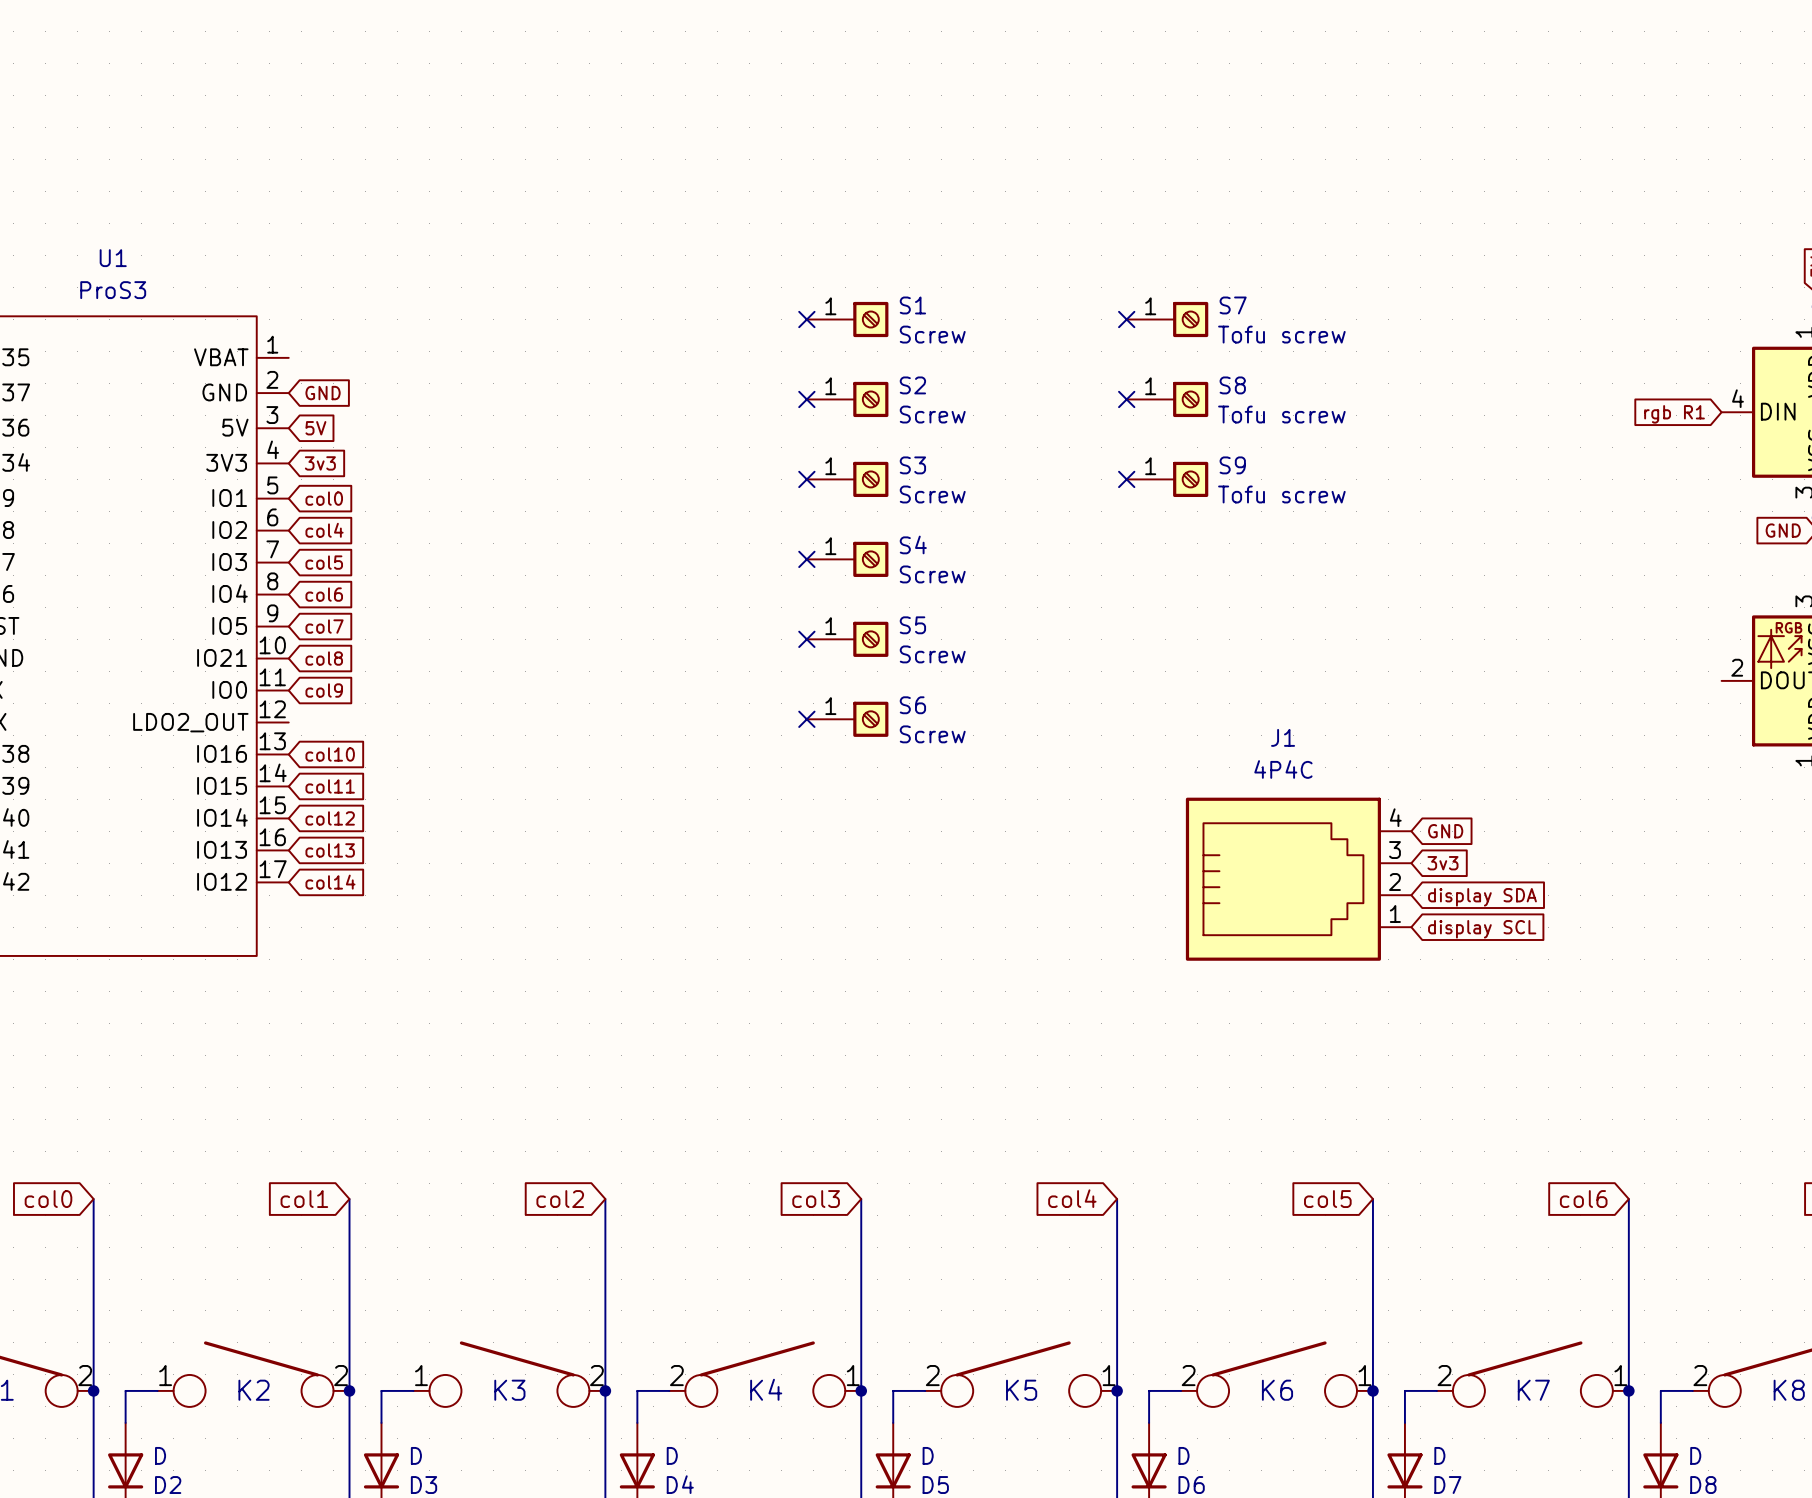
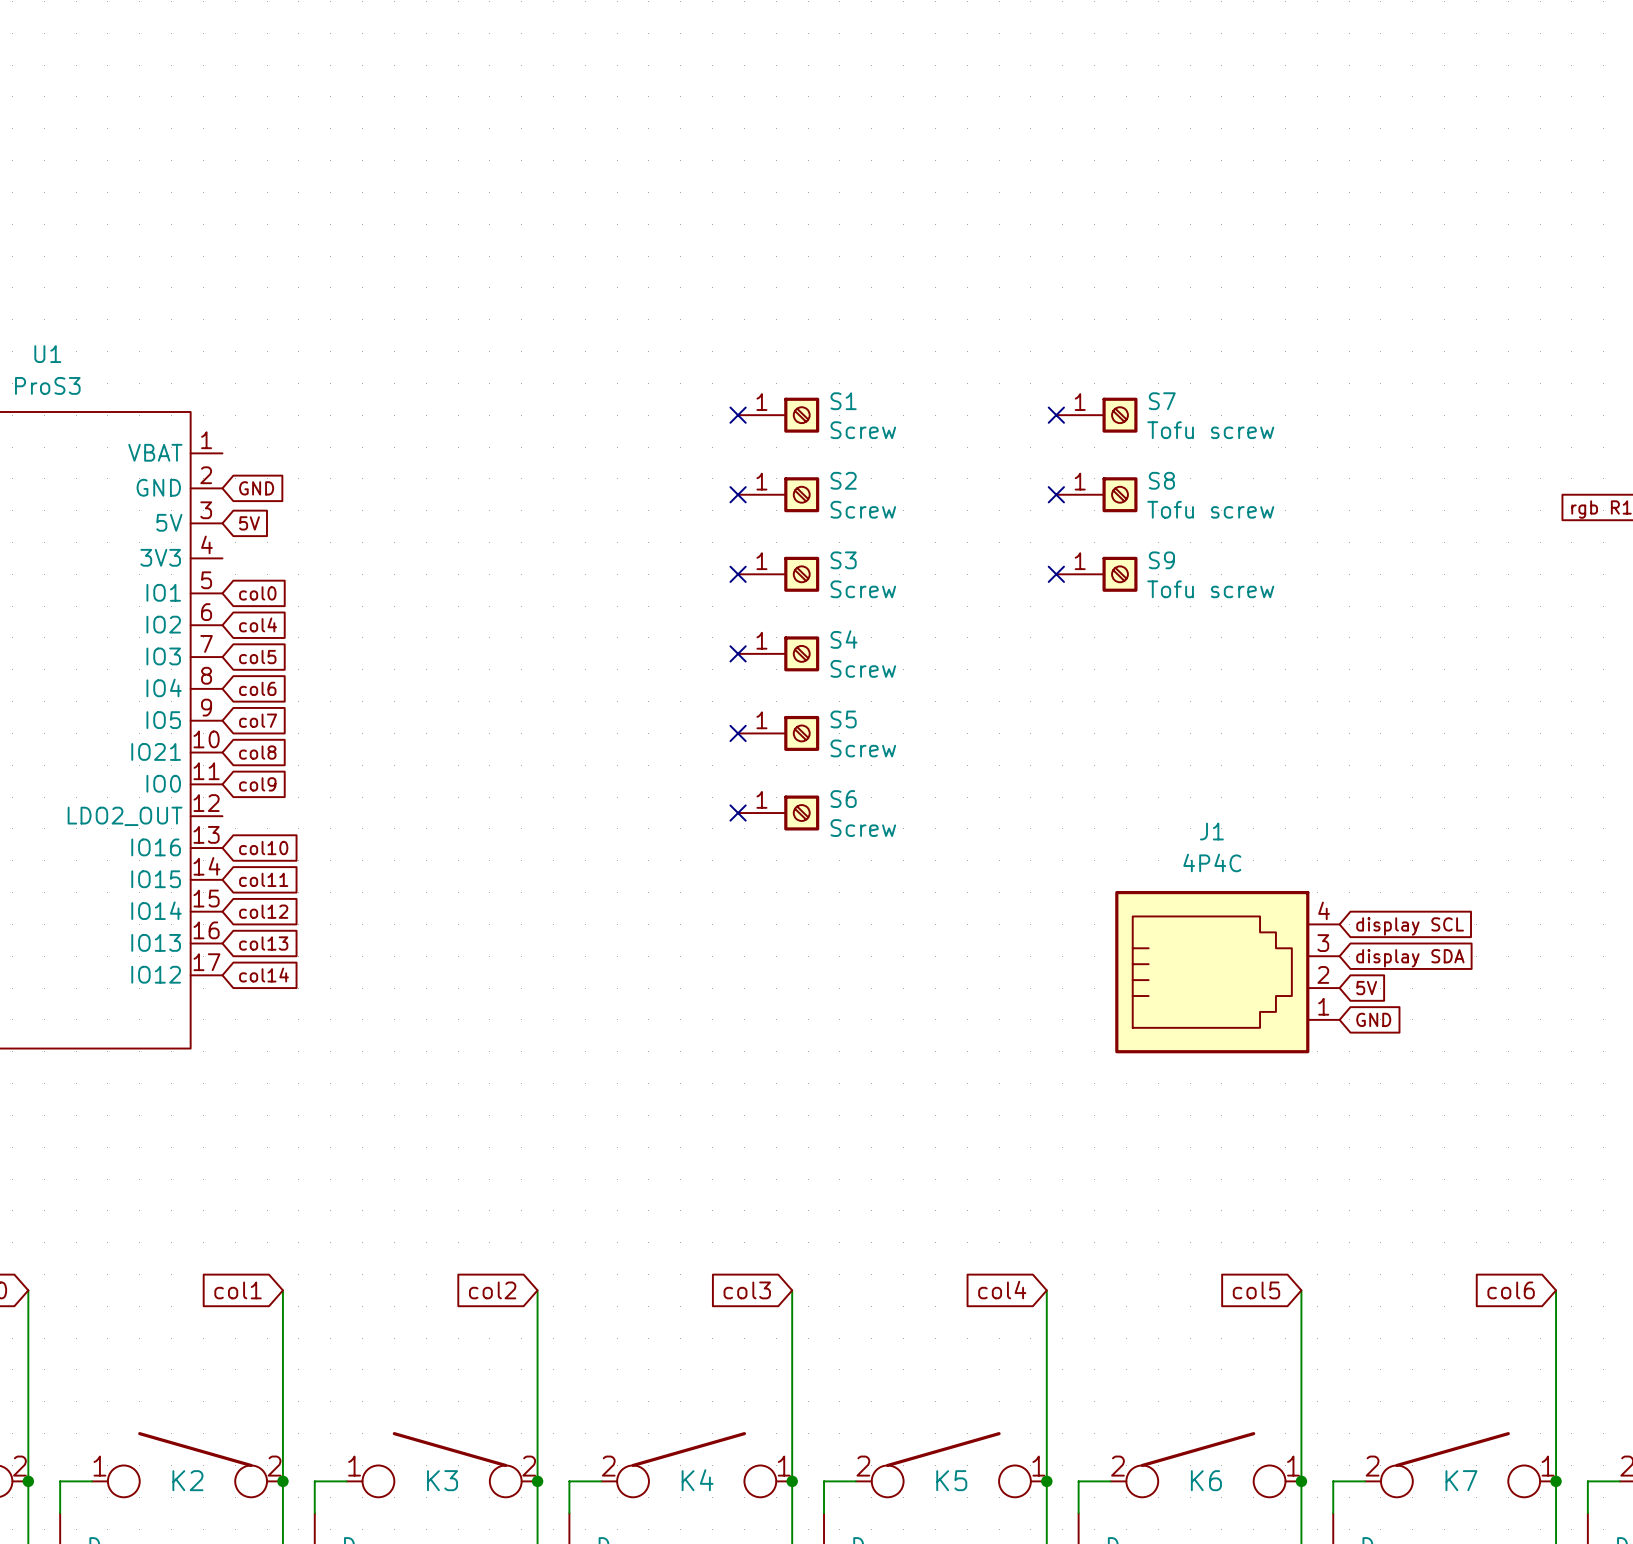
global label: 3v3 (320, 463) -> none
global label: GND (1445, 831) -> display SCL (1410, 926)
global label: 3v3 (1442, 863) -> display SDA (1410, 958)
global label: display SDA (1482, 897) -> 5V (1366, 988)
global label: display SCL (1482, 929) -> GND (1373, 1019)

